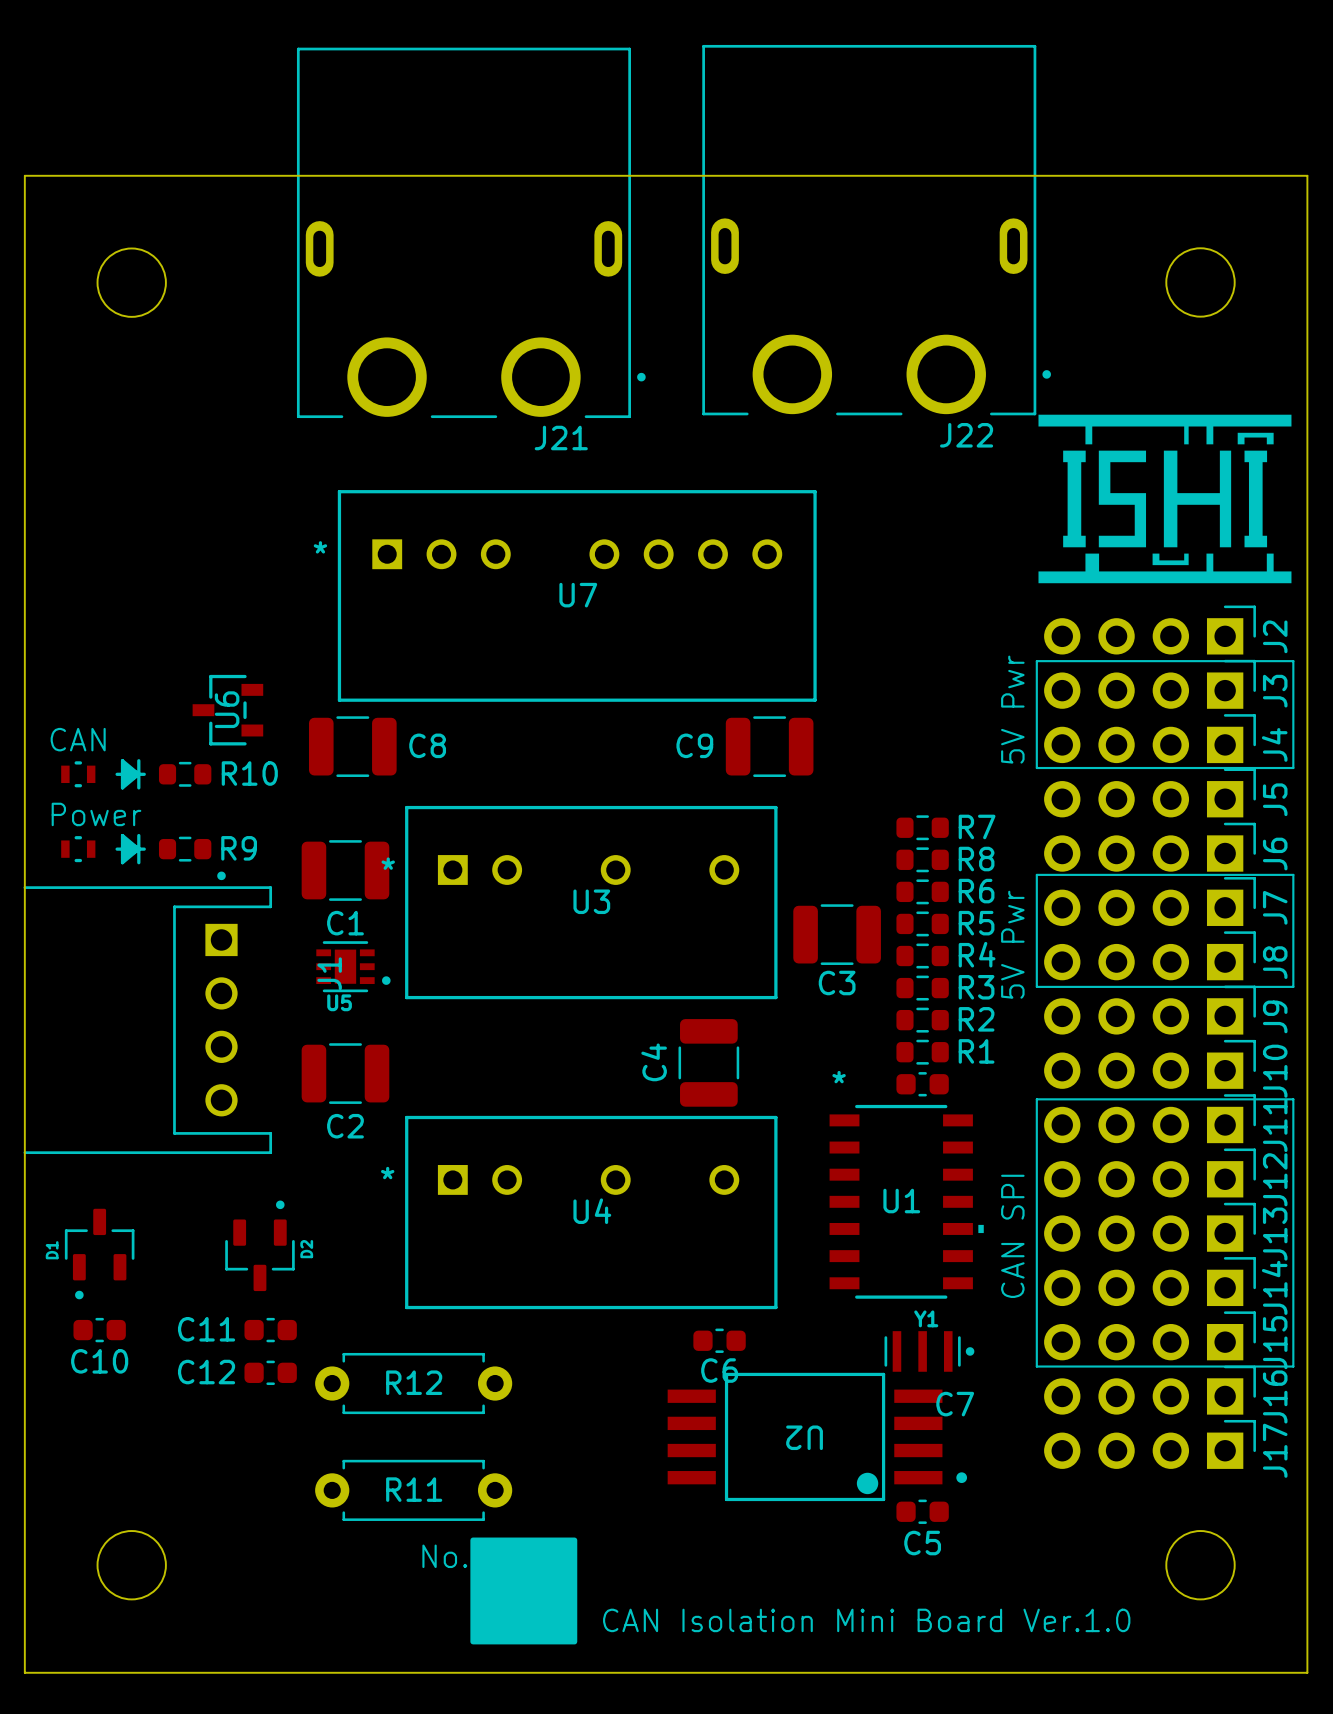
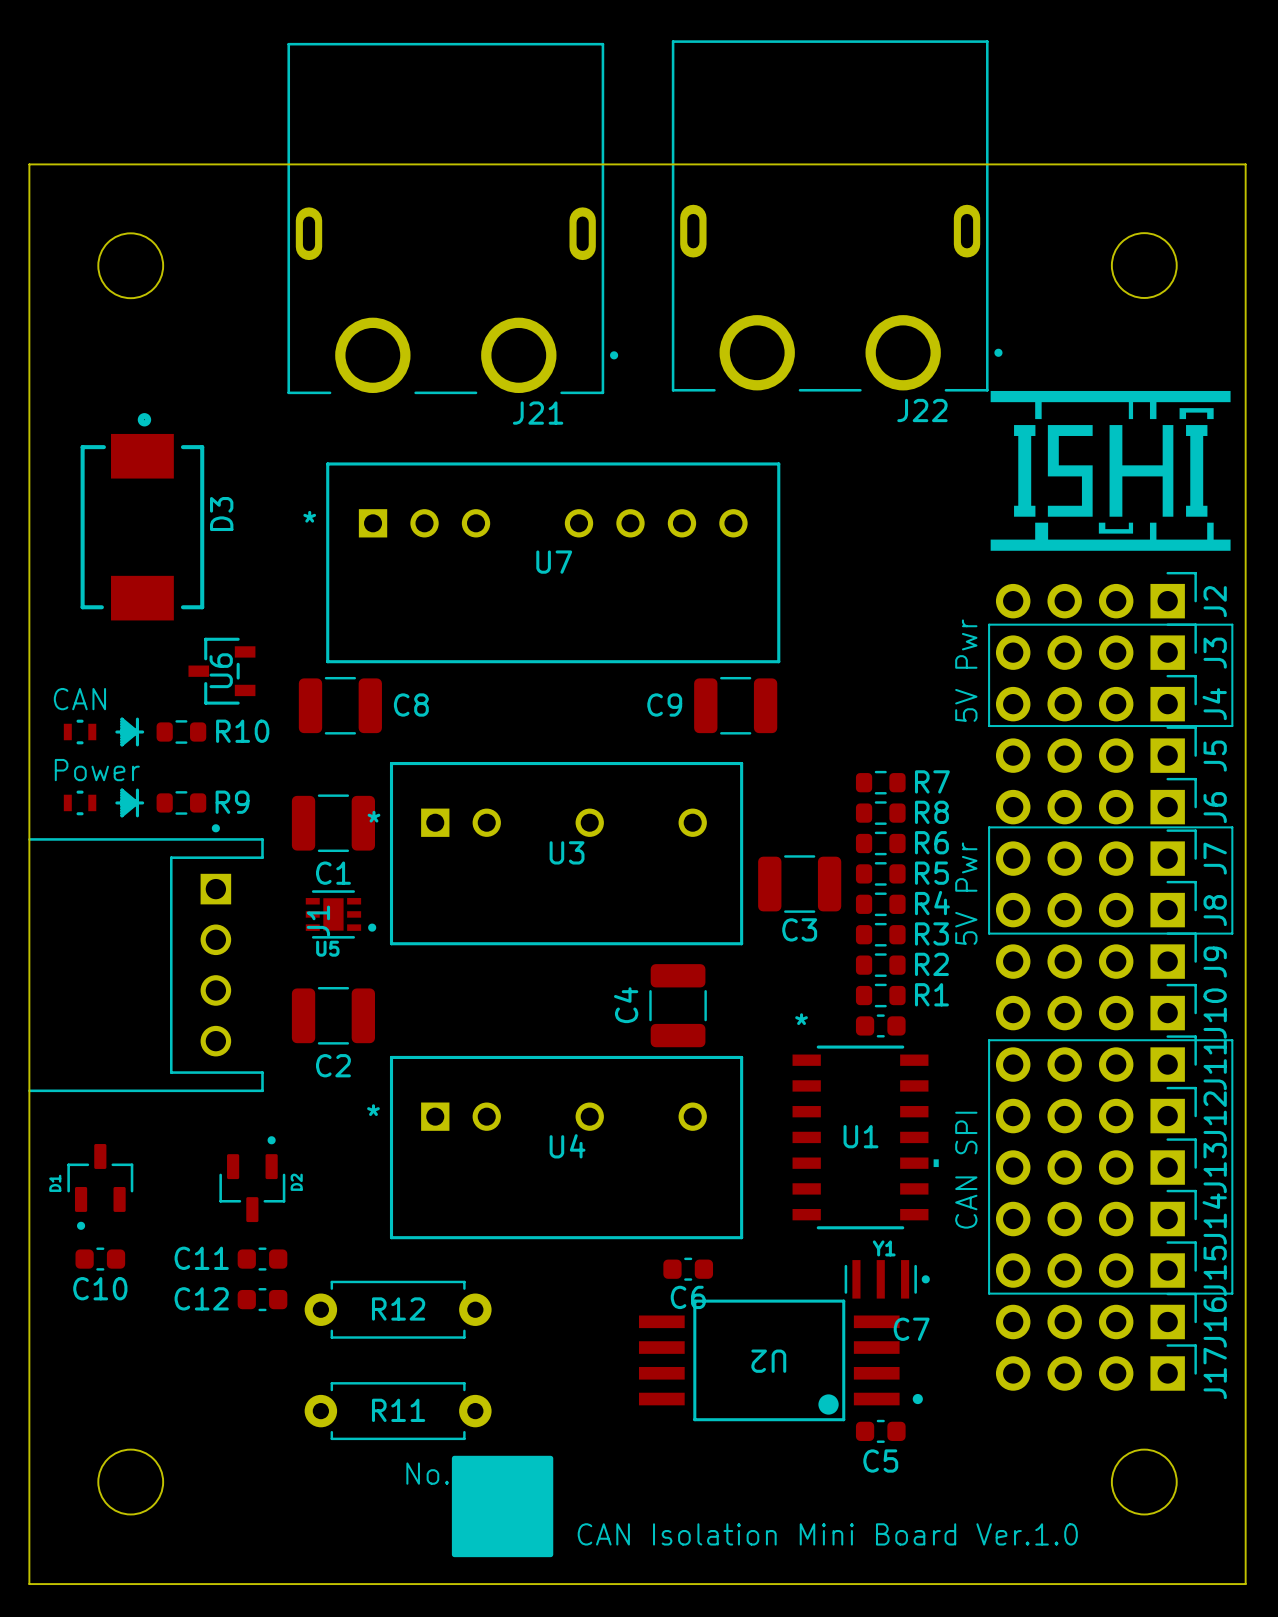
D3: none -> (142, 516)

